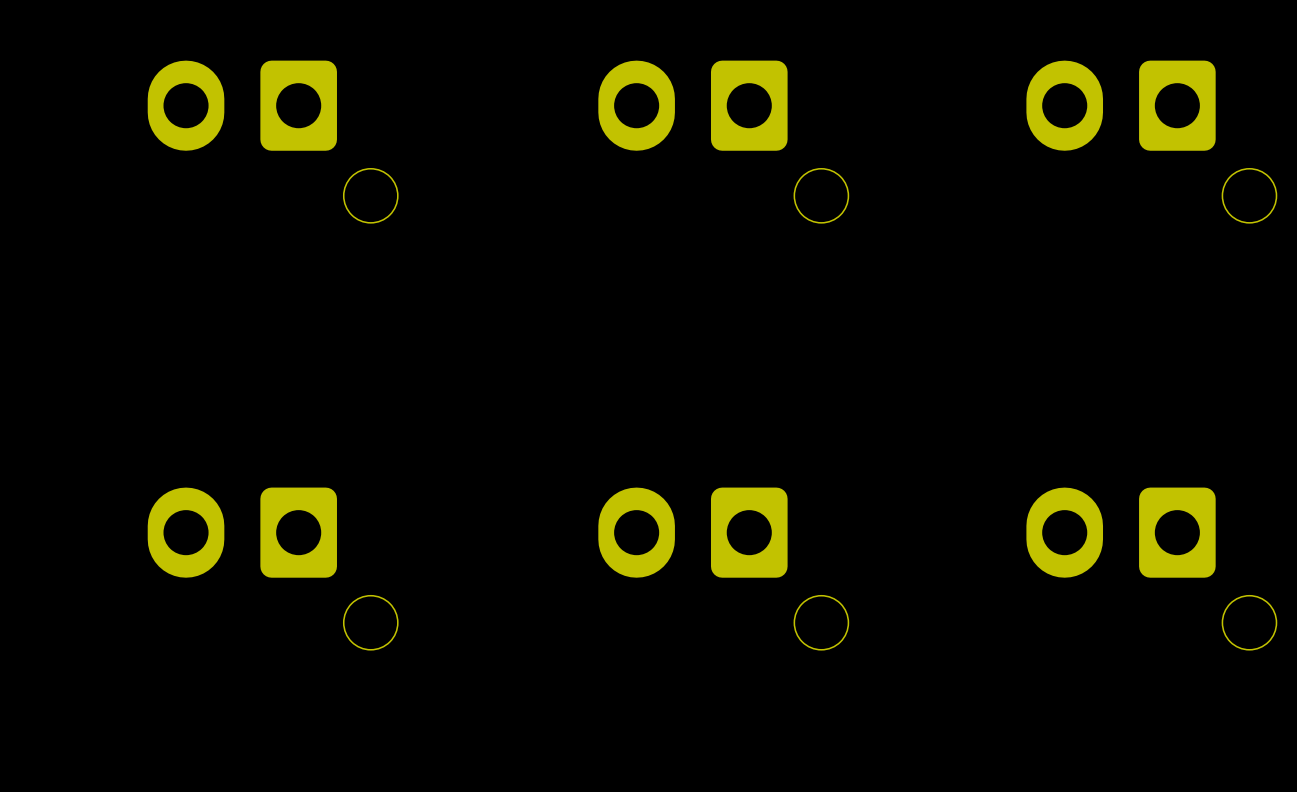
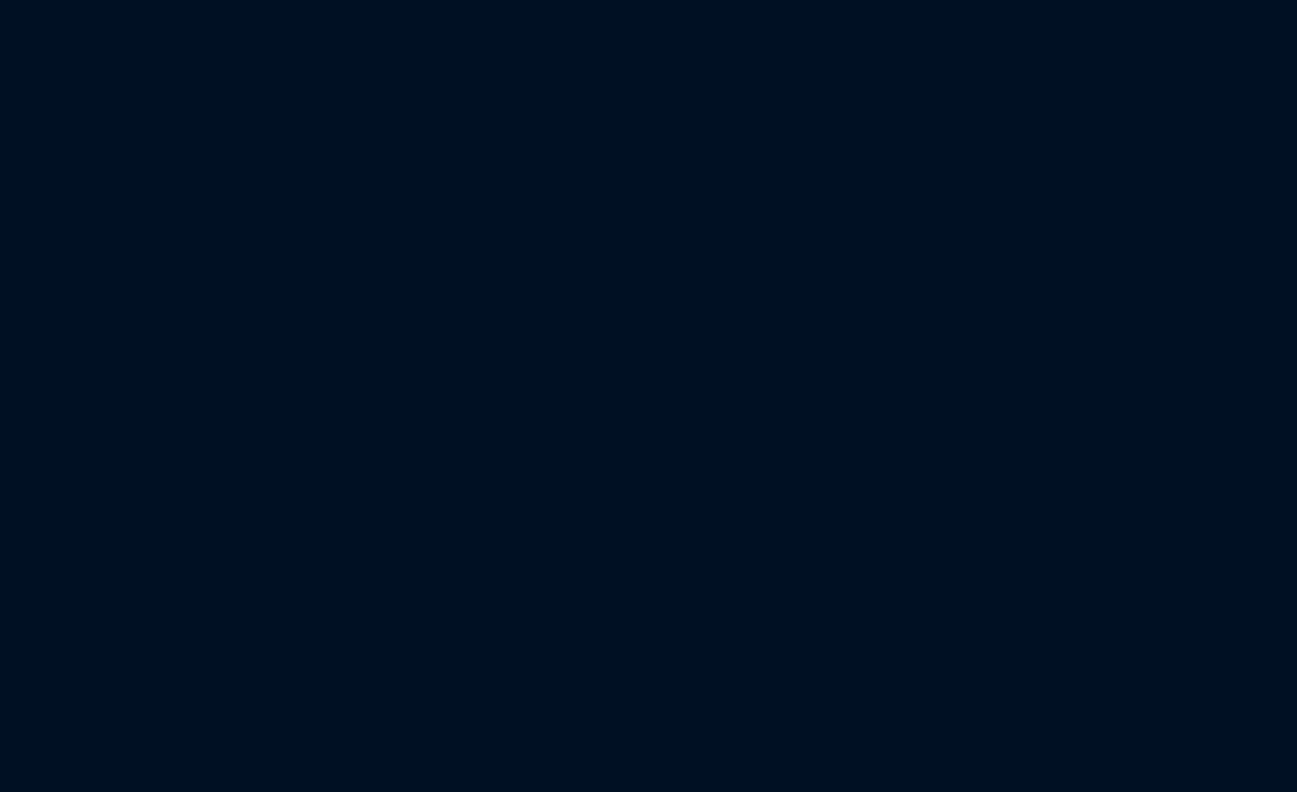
part: (272, 141) -> none
part: (723, 141) -> none
part: (1151, 141) -> none
part: (272, 568) -> none
part: (723, 568) -> none
part: (1151, 568) -> none

